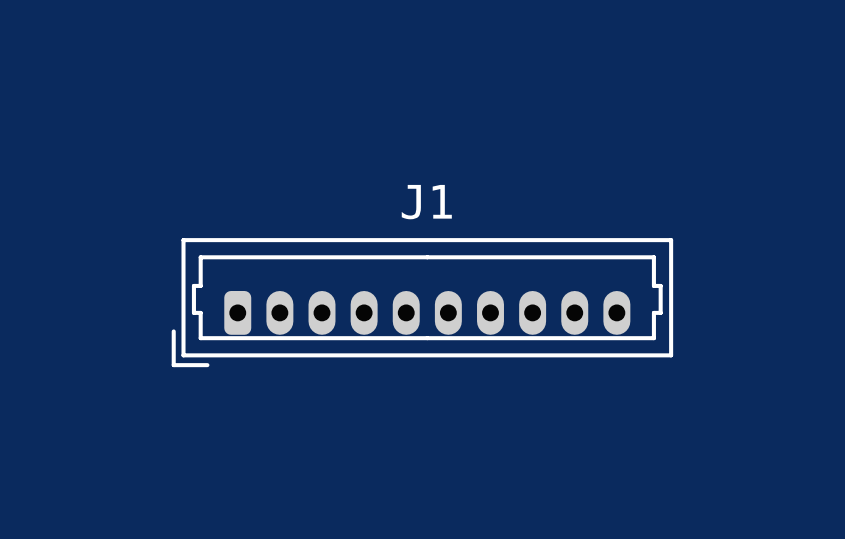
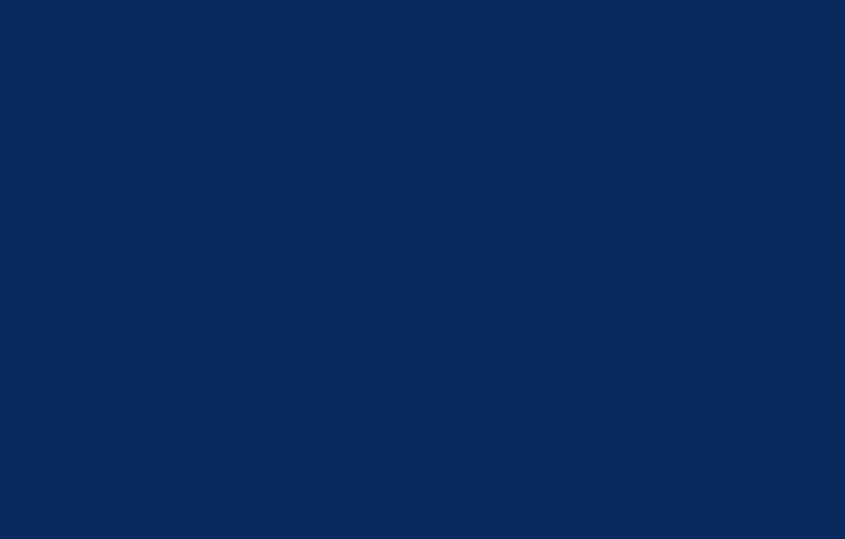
J1: (422, 302) -> none

